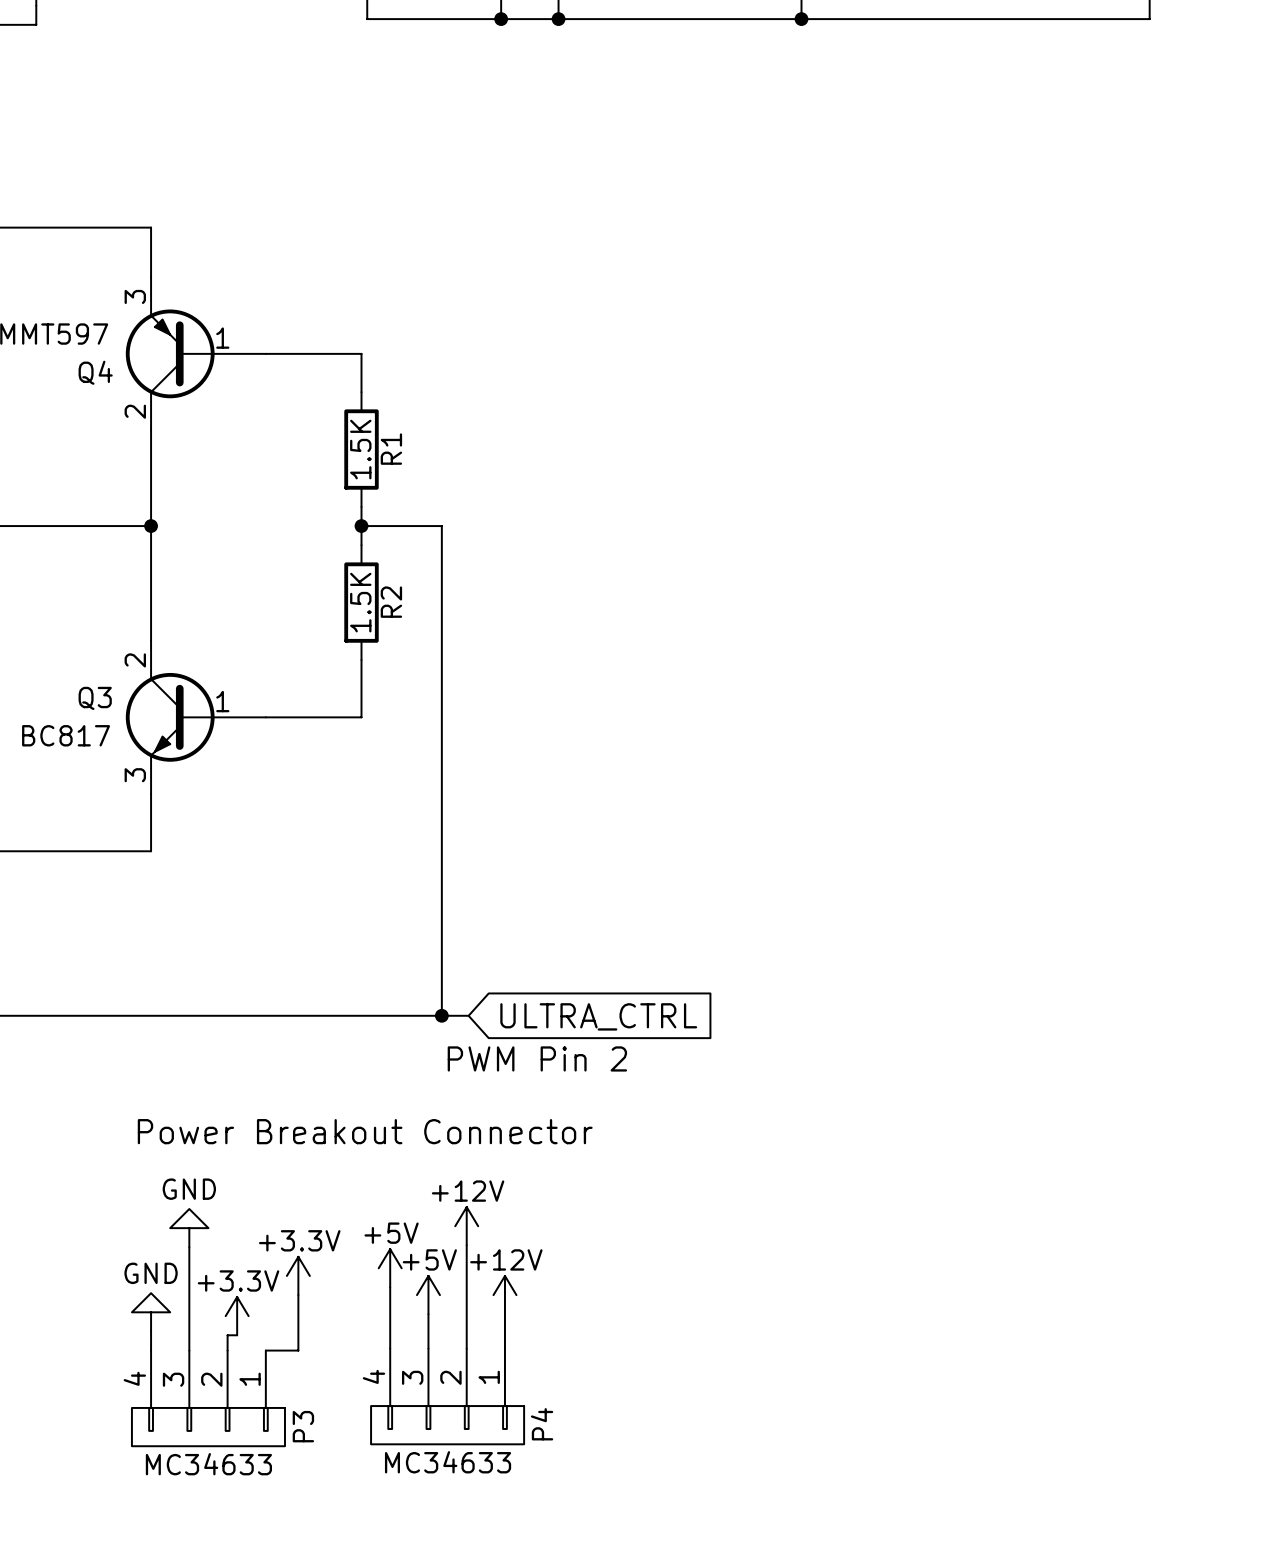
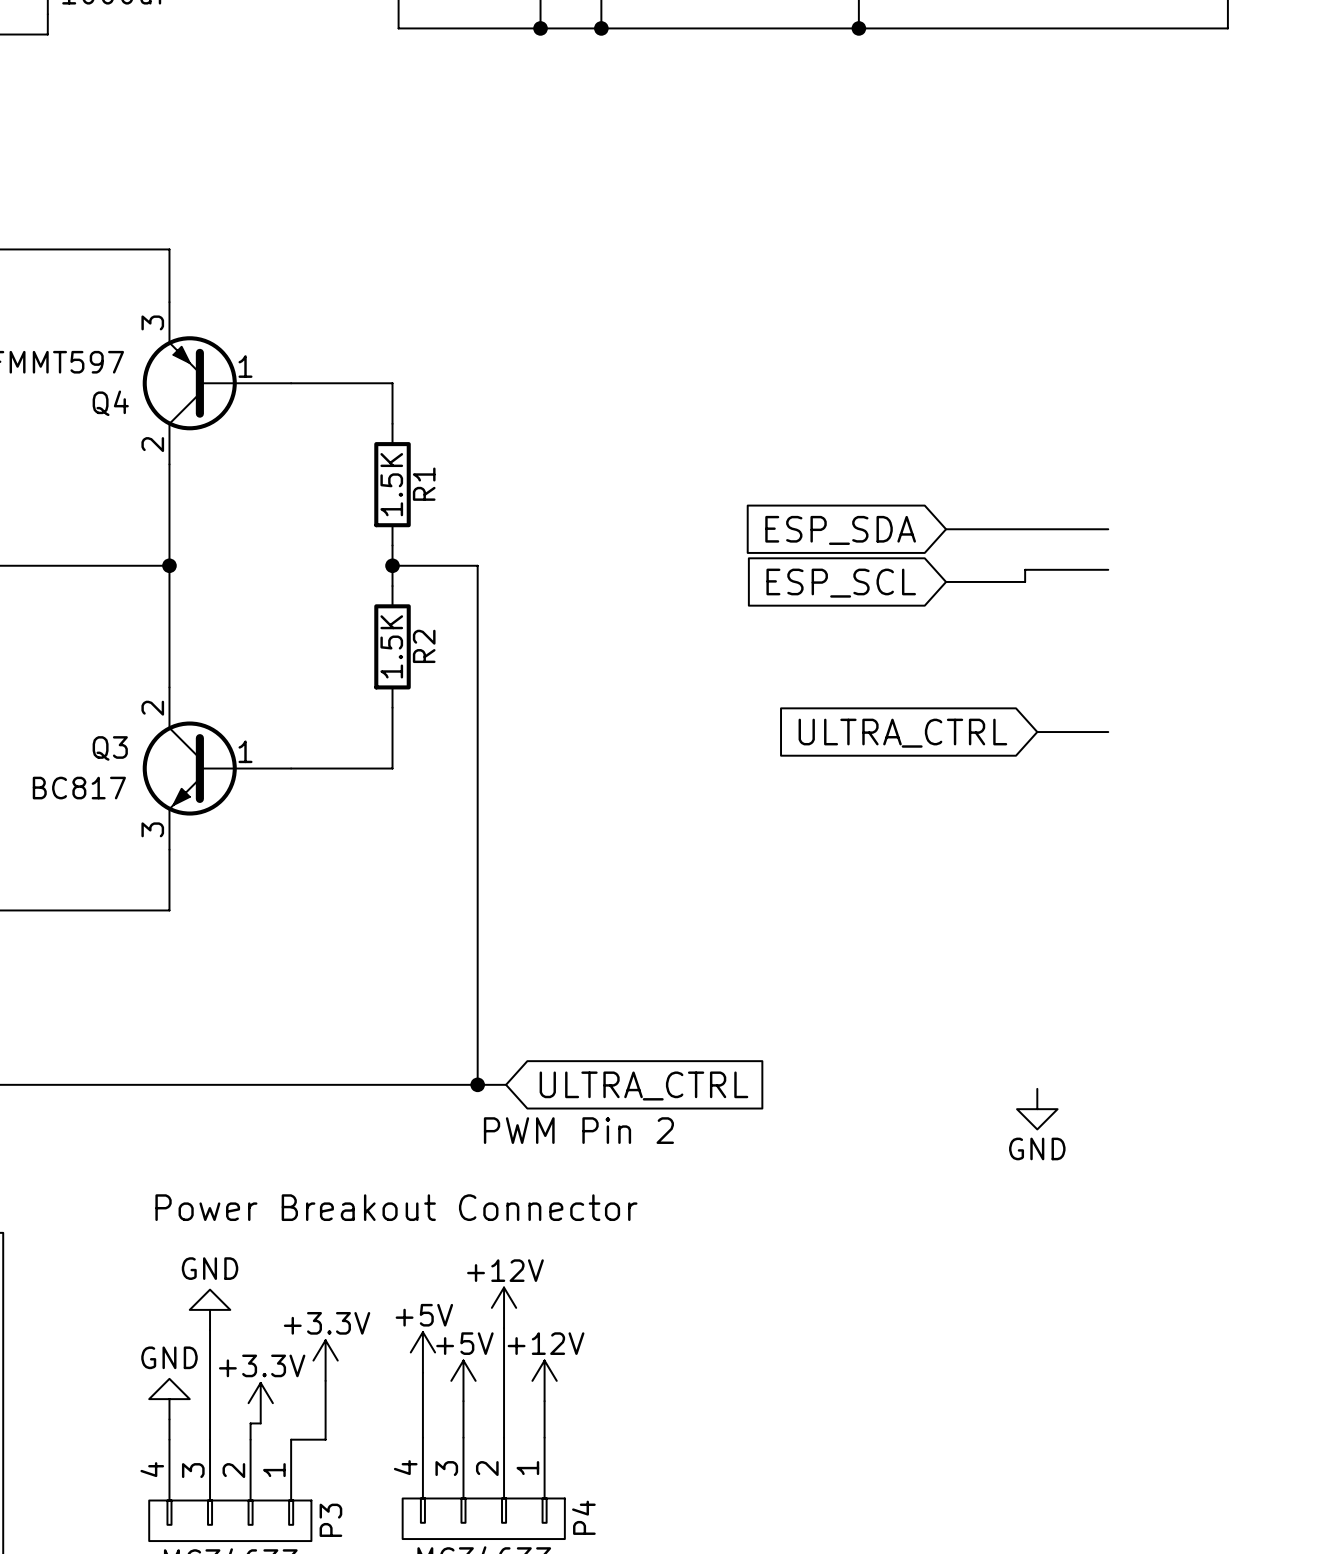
wire: none -> (946, 529) (1108, 529)
global label: none -> ESP_SDA (840, 530)
wire: none -> (1108, 569) (1025, 569) (1025, 581) (946, 581)
global label: none -> ESP_SCL (841, 583)
wire: none -> (1037, 732) (1108, 732)
global label: none -> ULTRA_CTRL (902, 733)
power symbol: none -> GND (1037, 1109)

